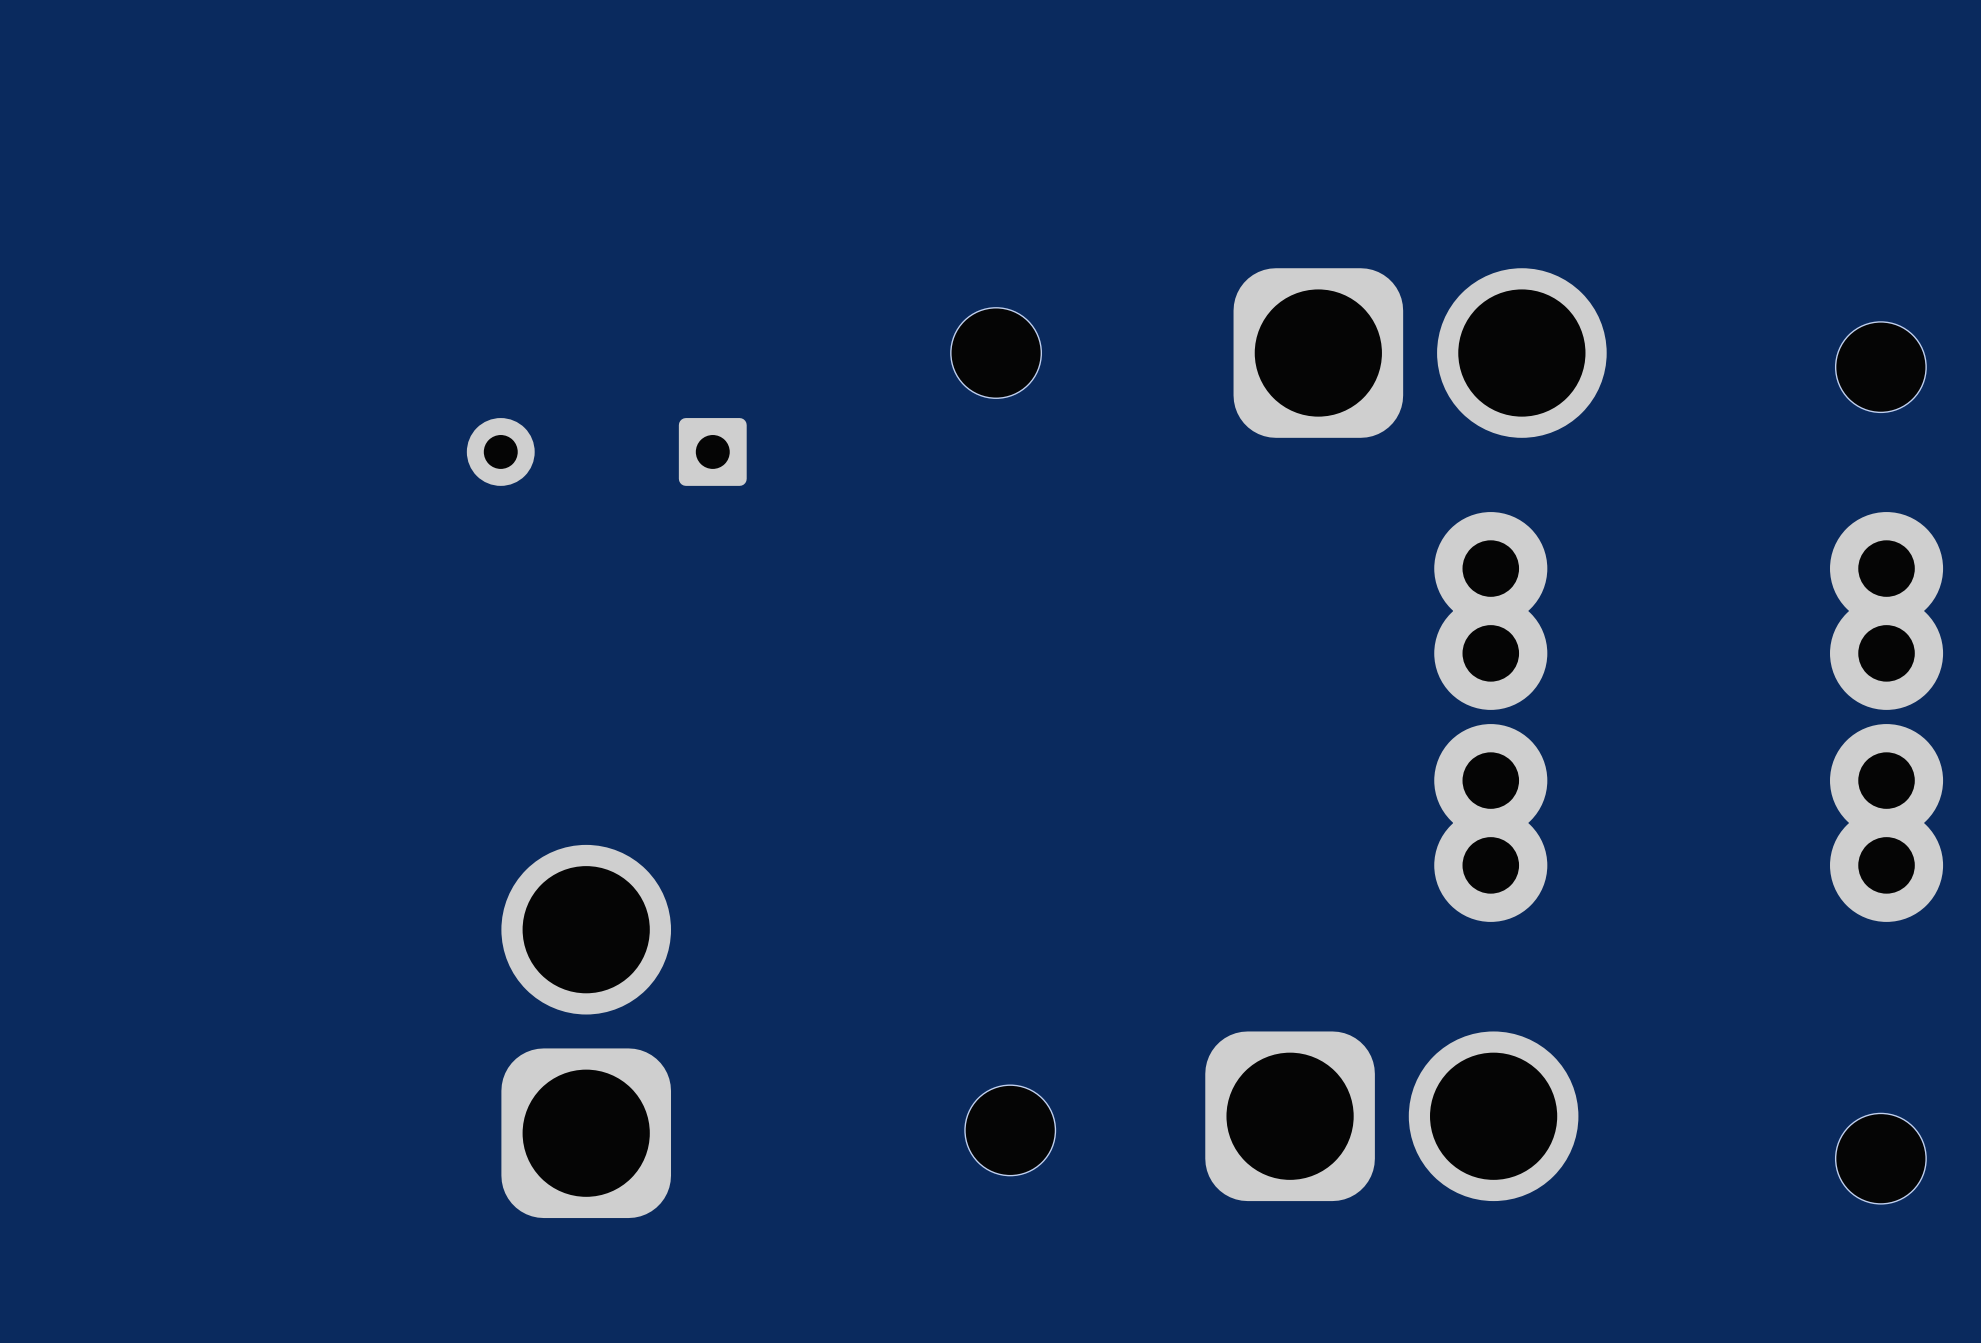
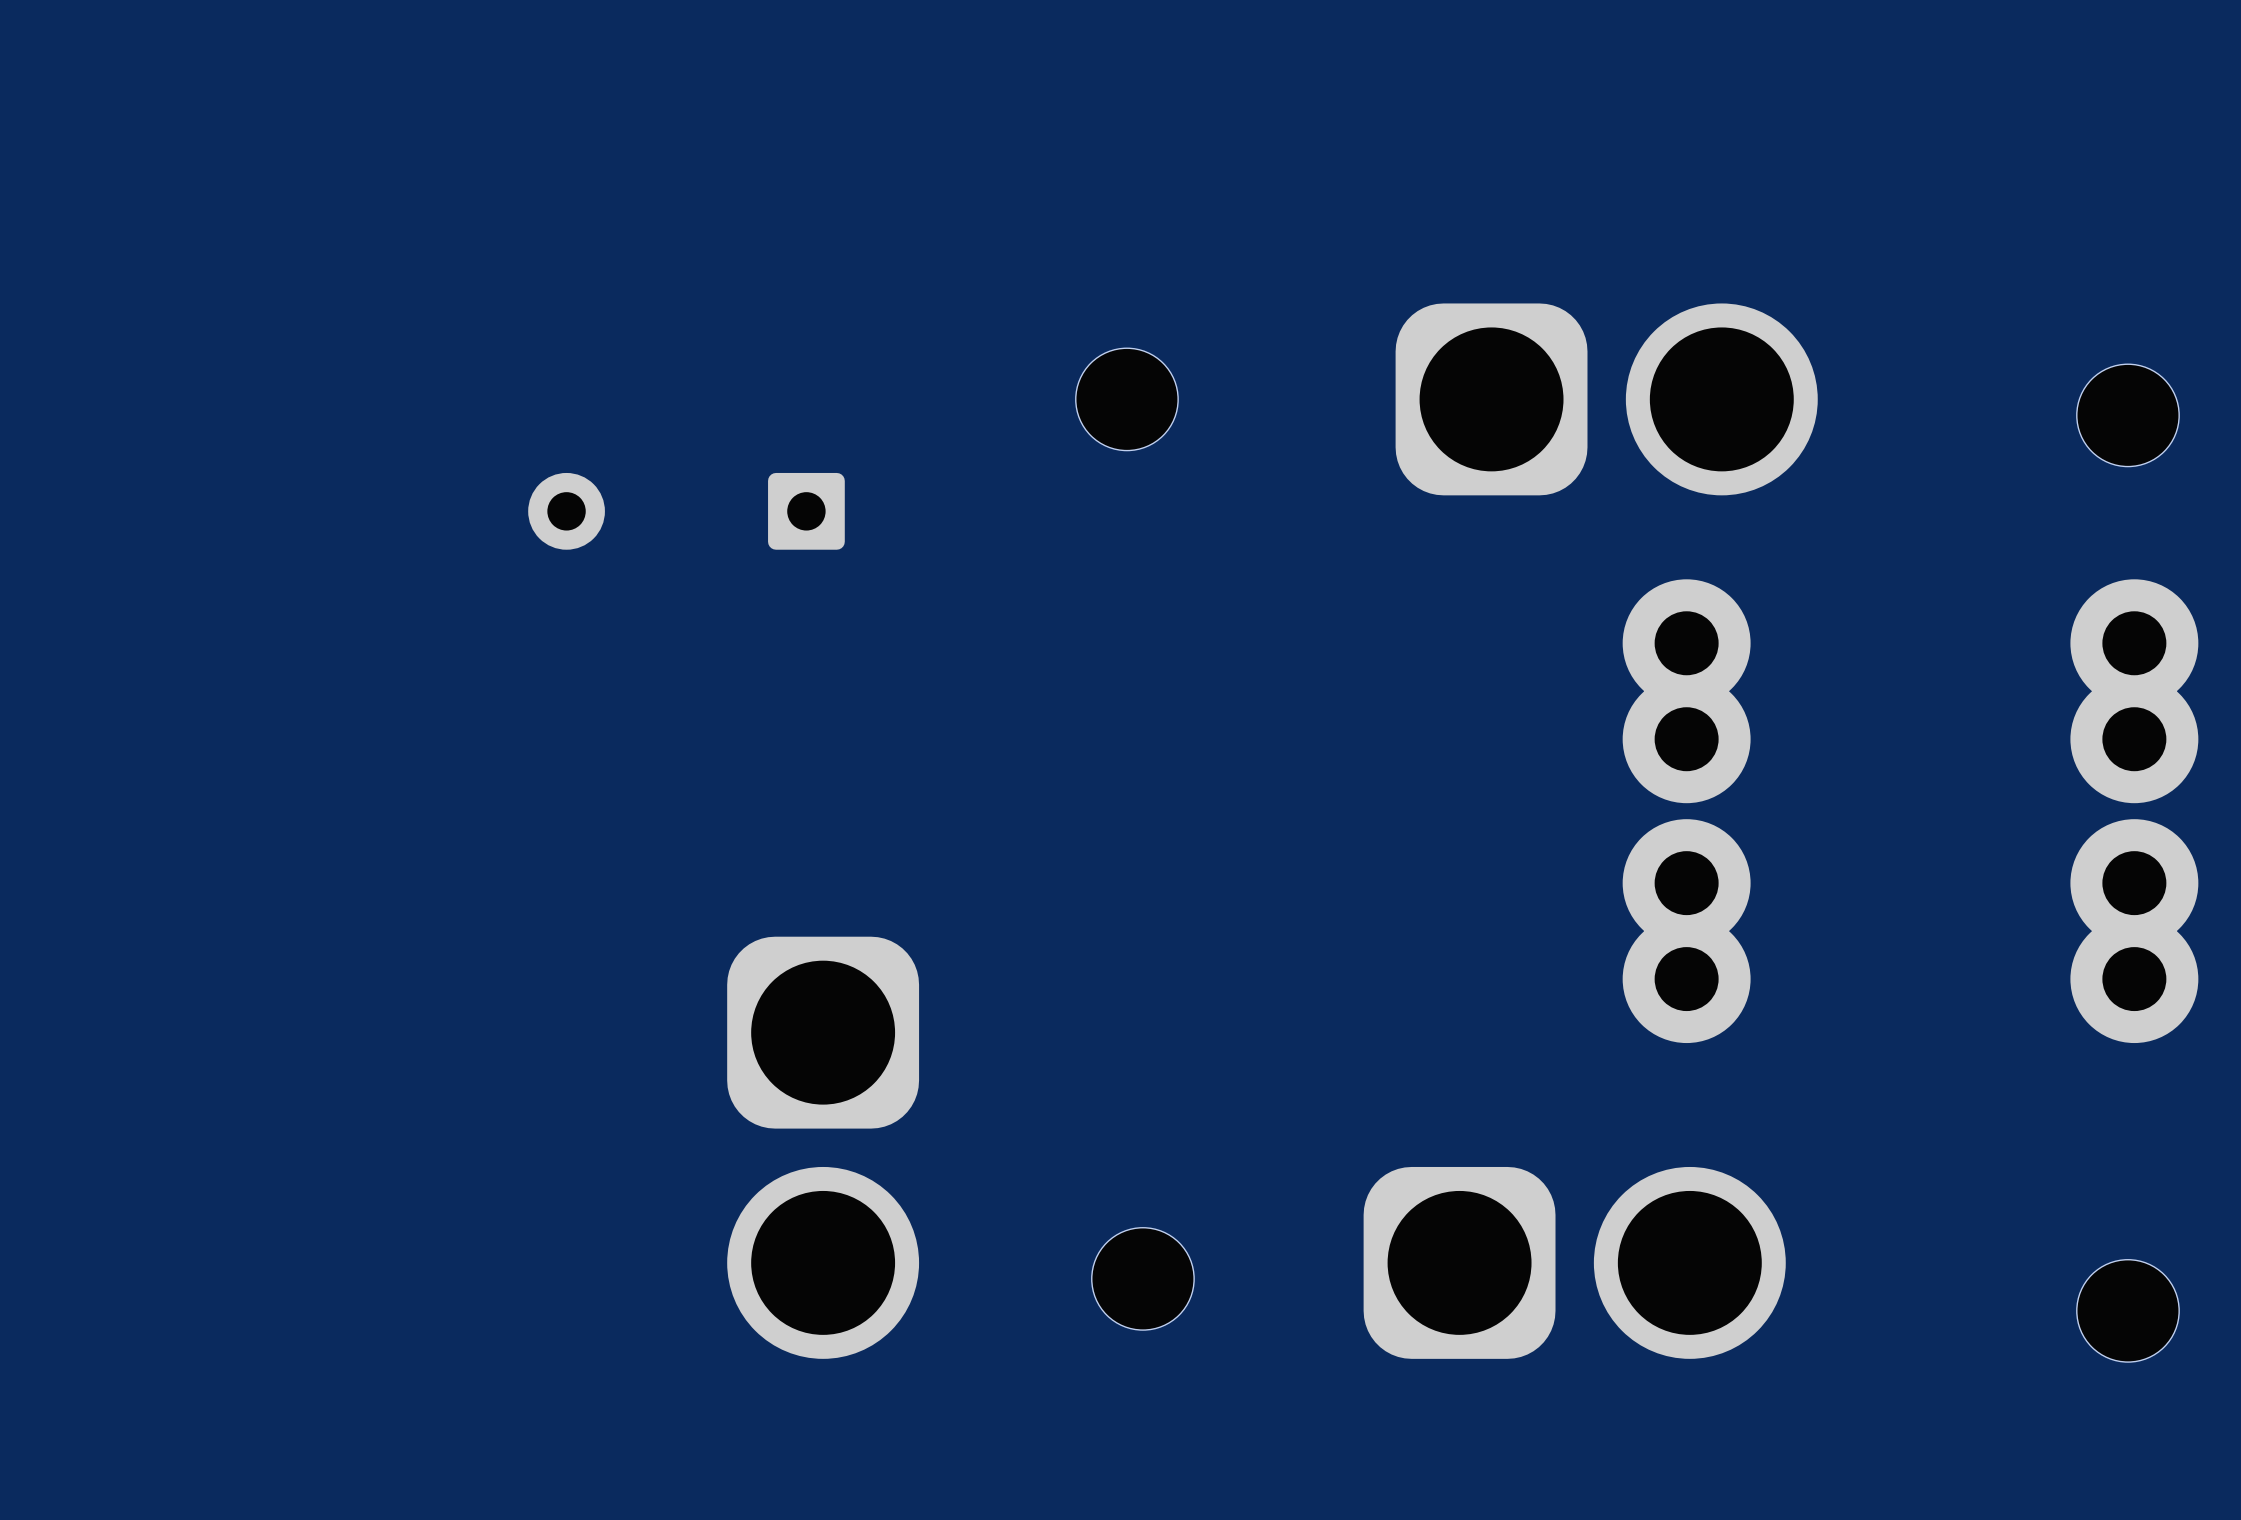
part rotation: 0° (586, 1031) -> 180° (823, 1147)

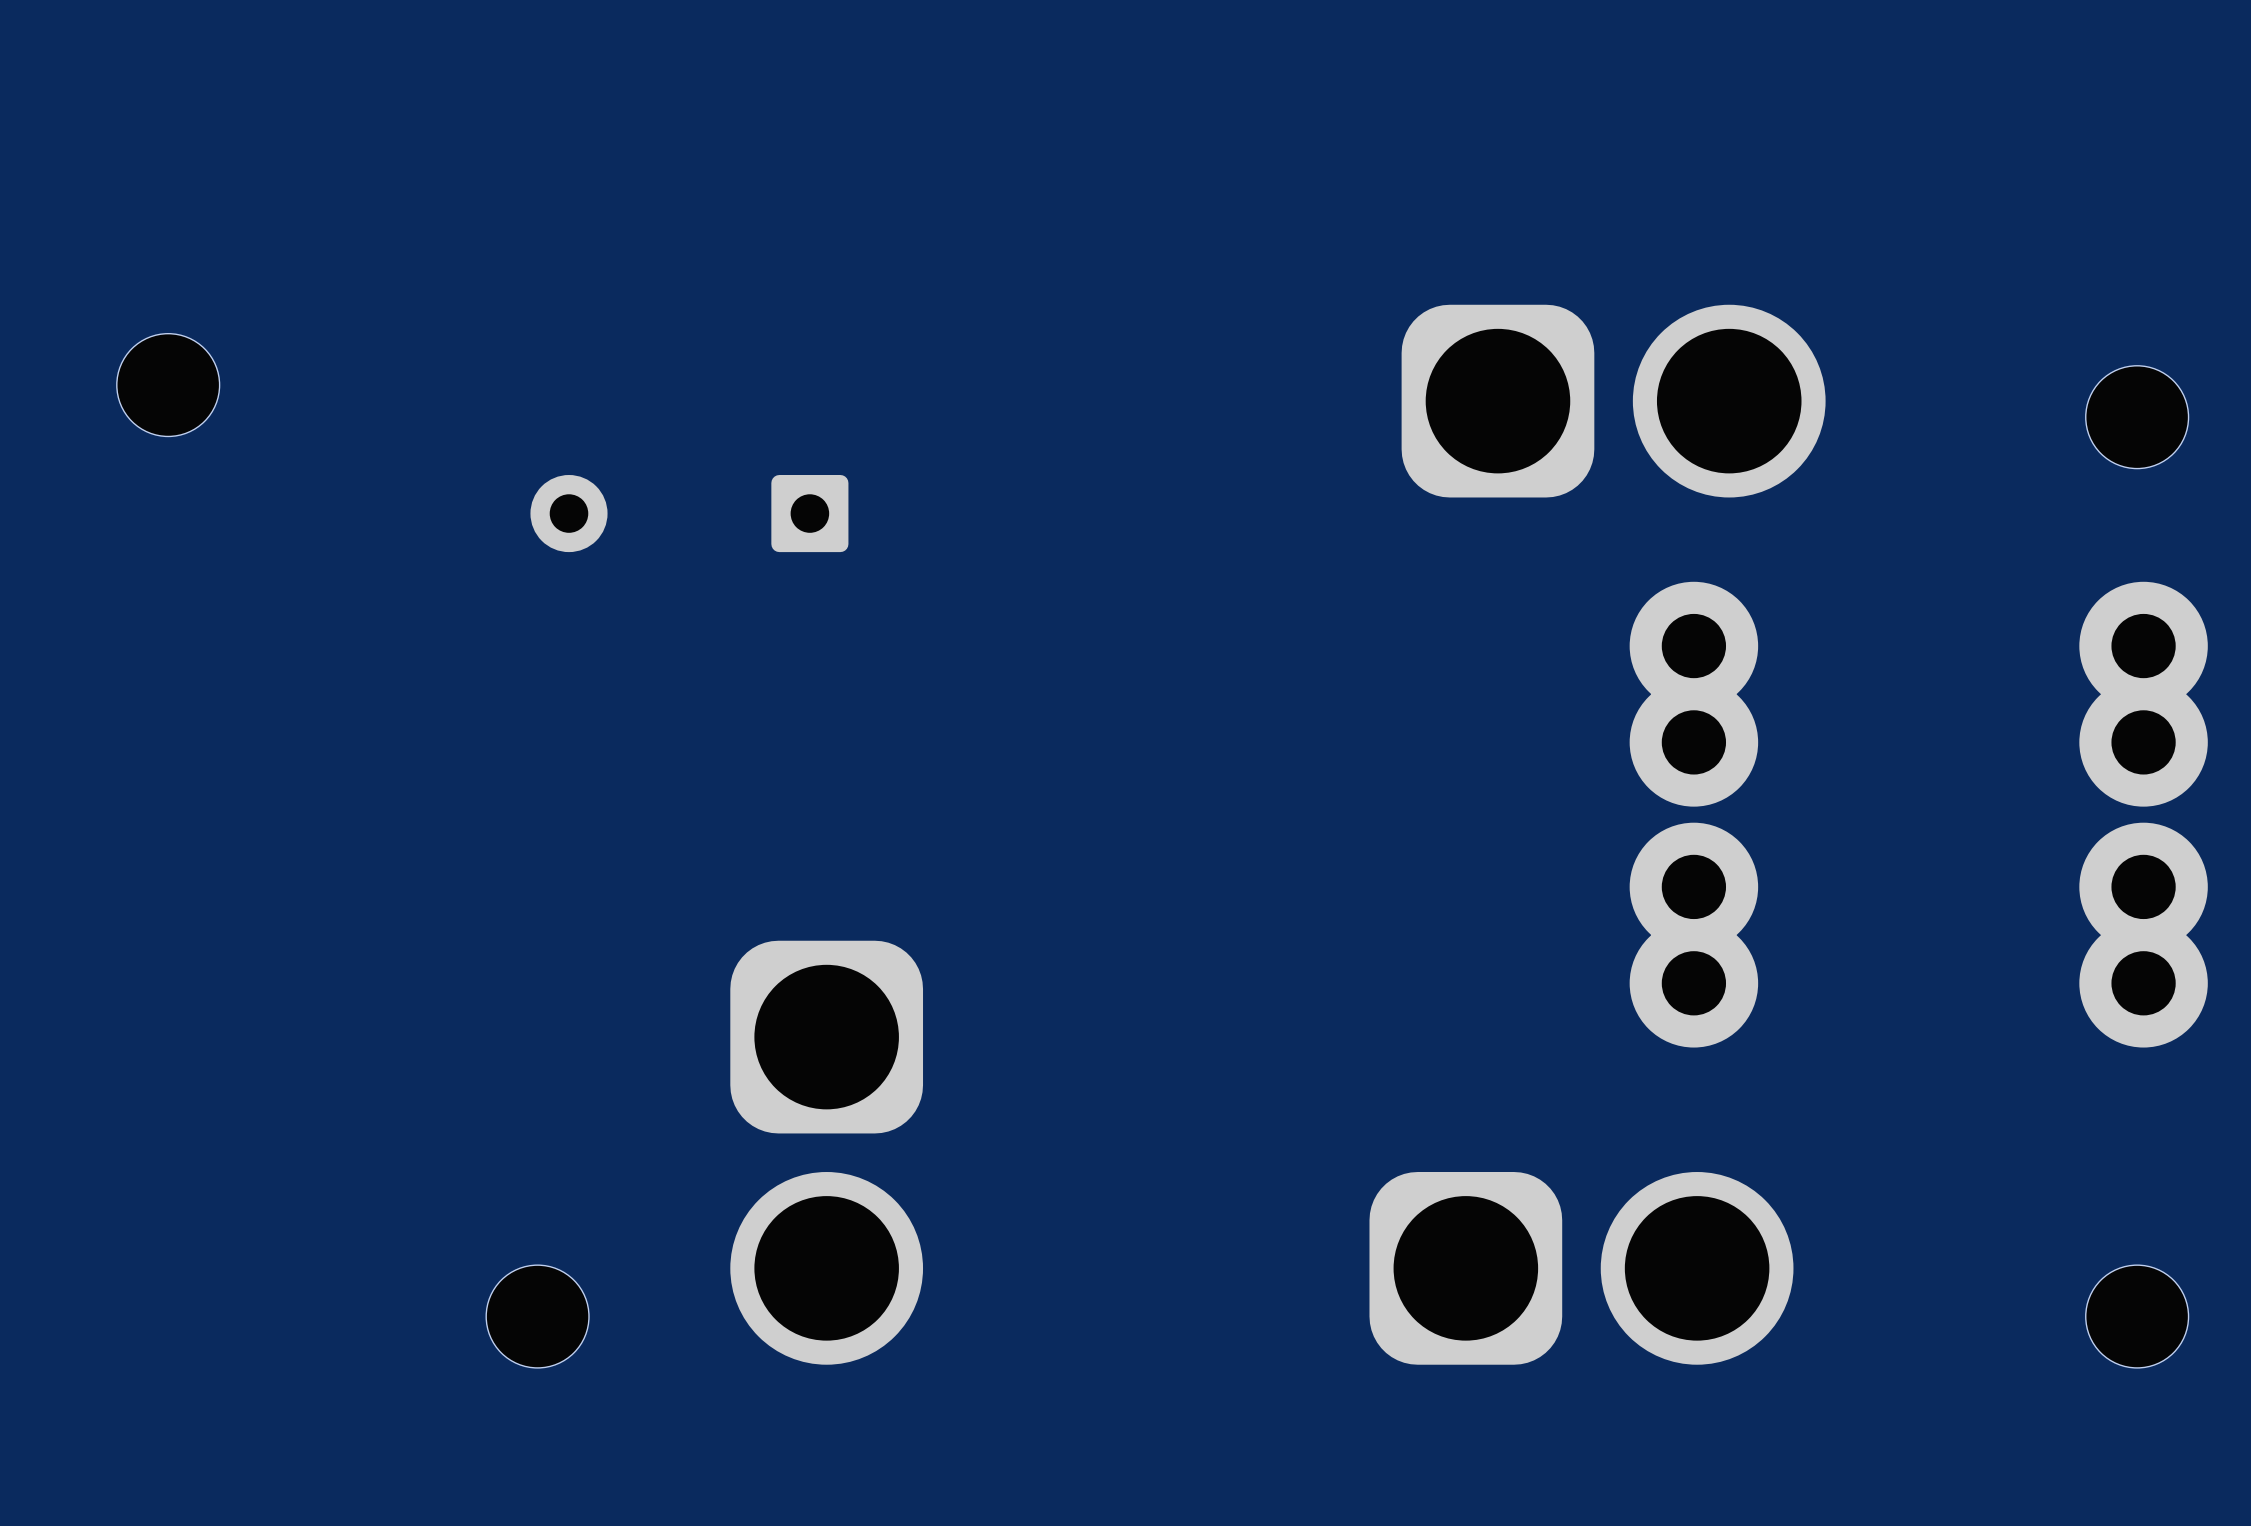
part: none -> (168, 385)
part: (1126, 399) -> none
part: (1142, 1278) -> none
part: none -> (537, 1316)

